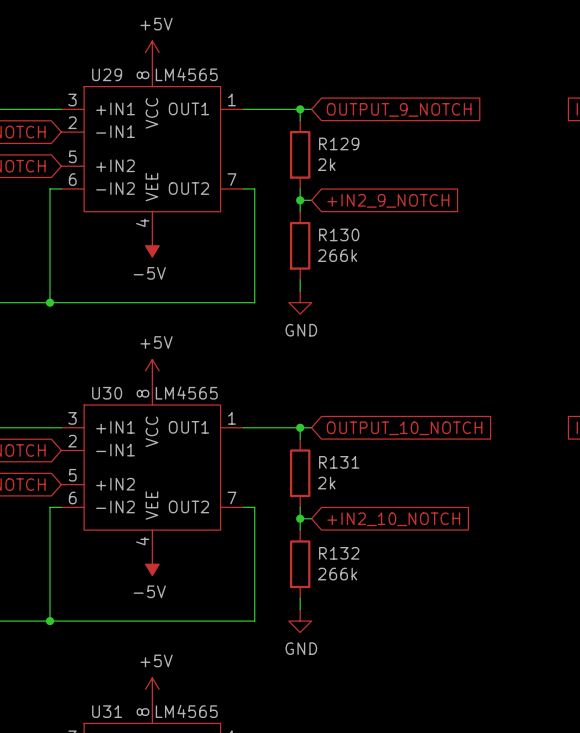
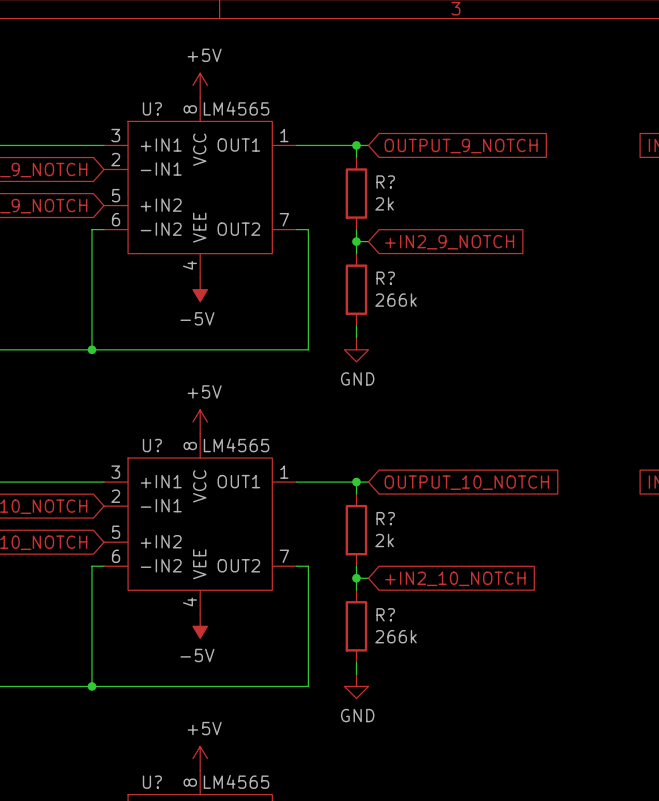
U29 name: U29 (107, 74) -> U? (152, 108)
R129 name: R129 (339, 143) -> R? (385, 182)
R130 name: R130 (339, 234) -> R? (385, 278)
U30 name: U30 (107, 393) -> U? (152, 445)
R131 name: R131 (339, 462) -> R? (385, 518)
R132 name: R132 (339, 553) -> R? (385, 614)
U31 name: U31 (107, 711) -> U? (152, 782)

